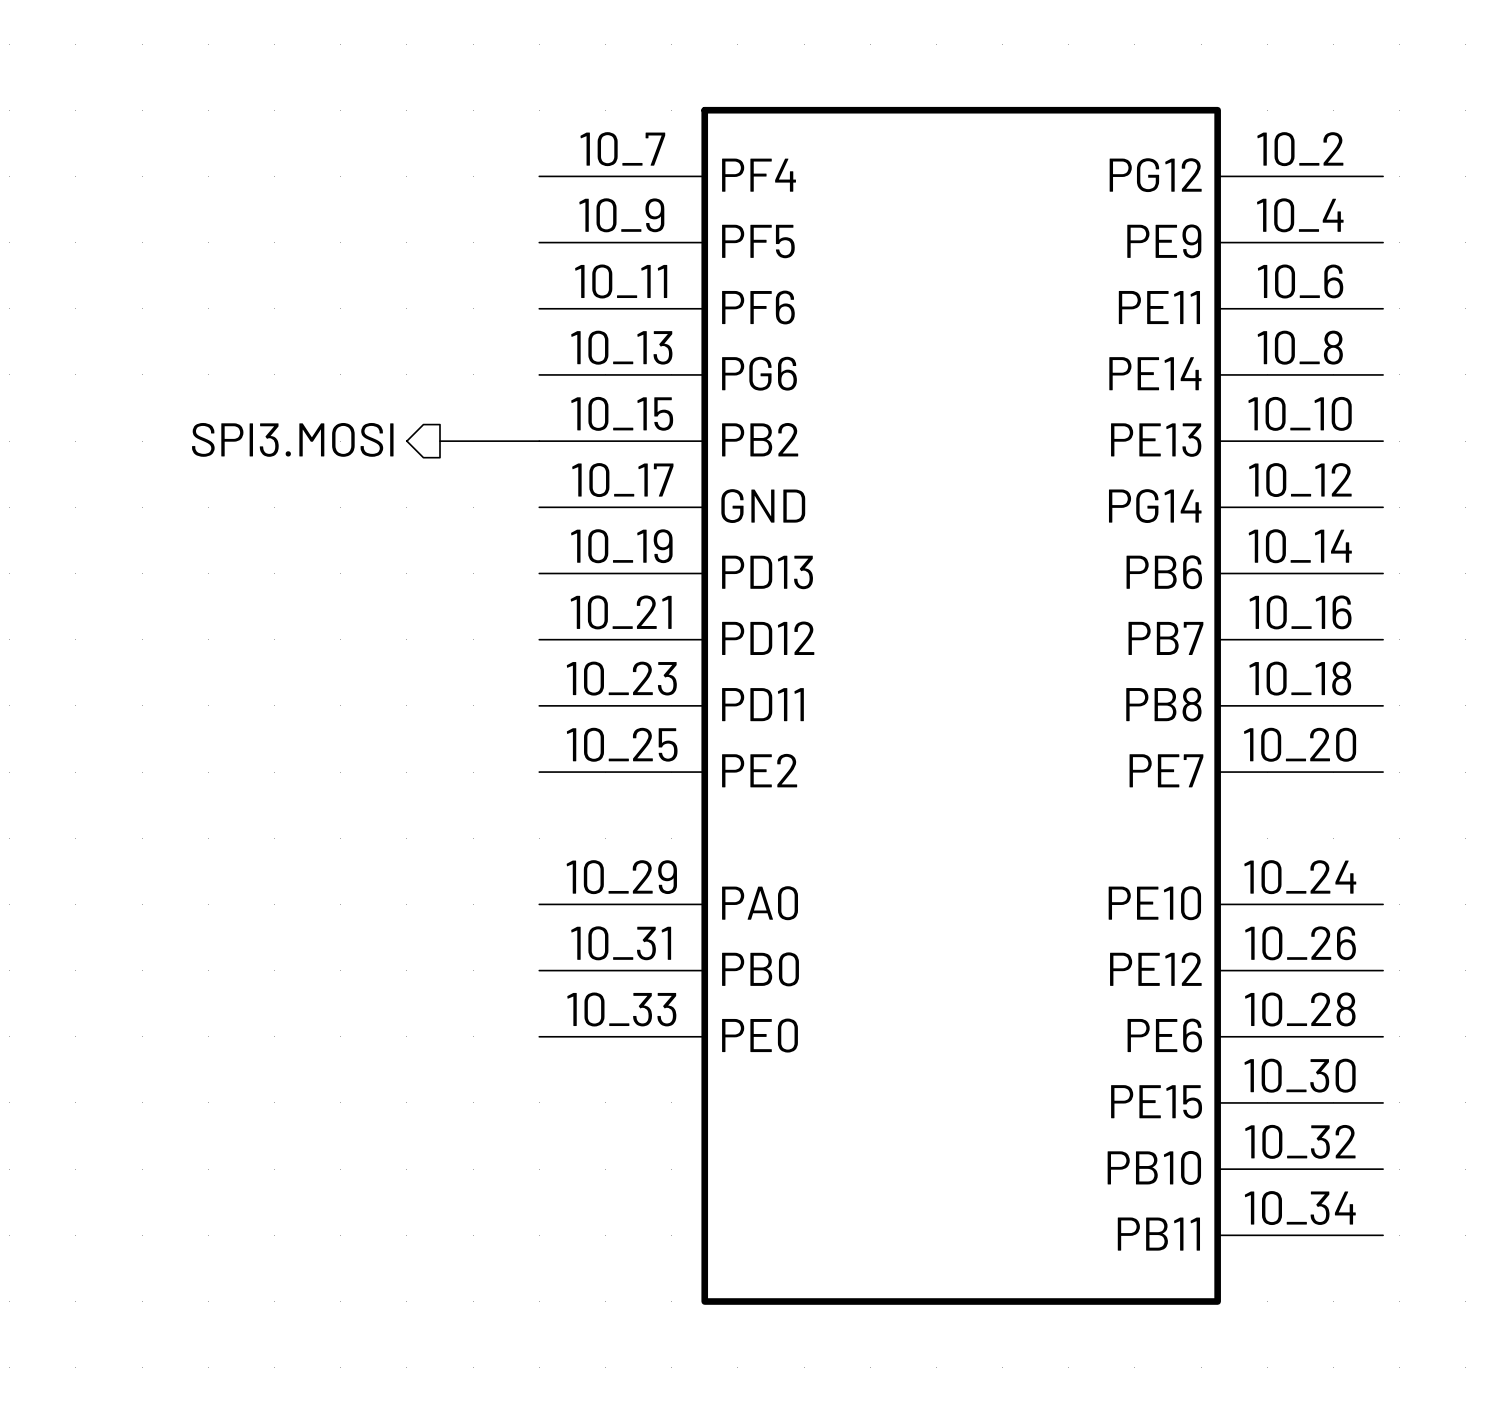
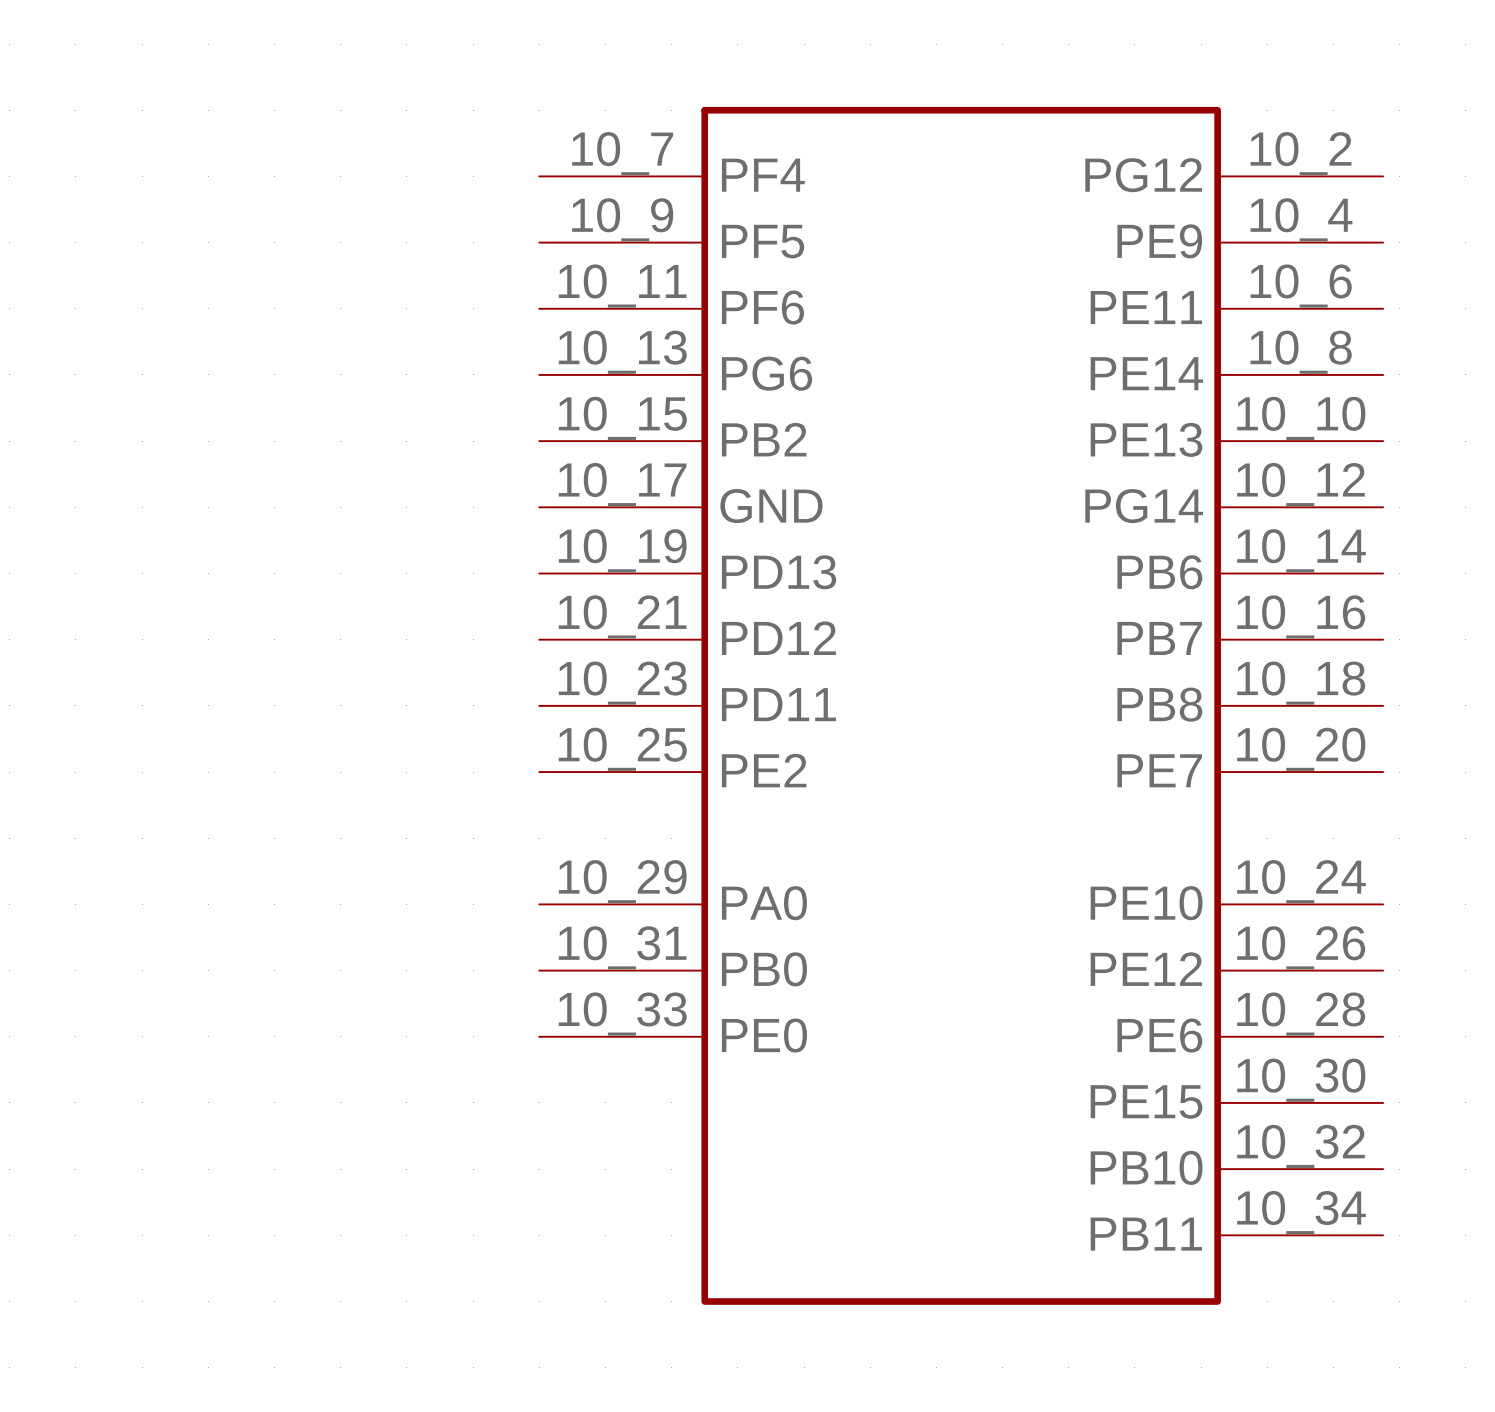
hierarchical label: SPI3.MOSI (292, 439) -> none
wire: (440, 441) (539, 441) -> none

